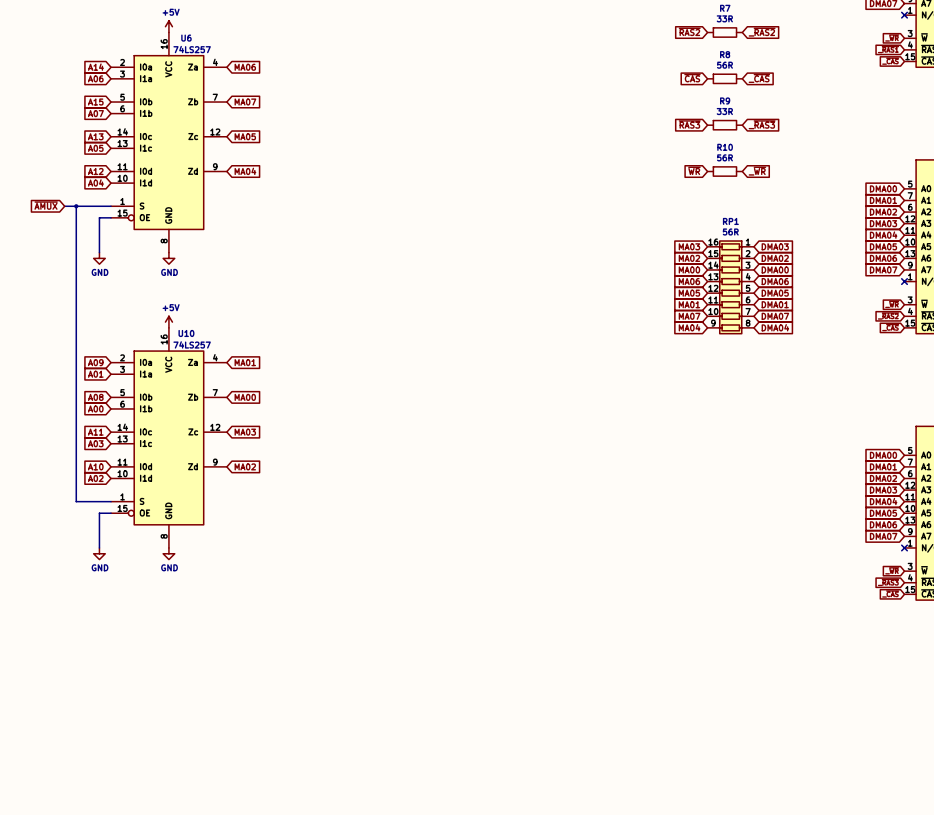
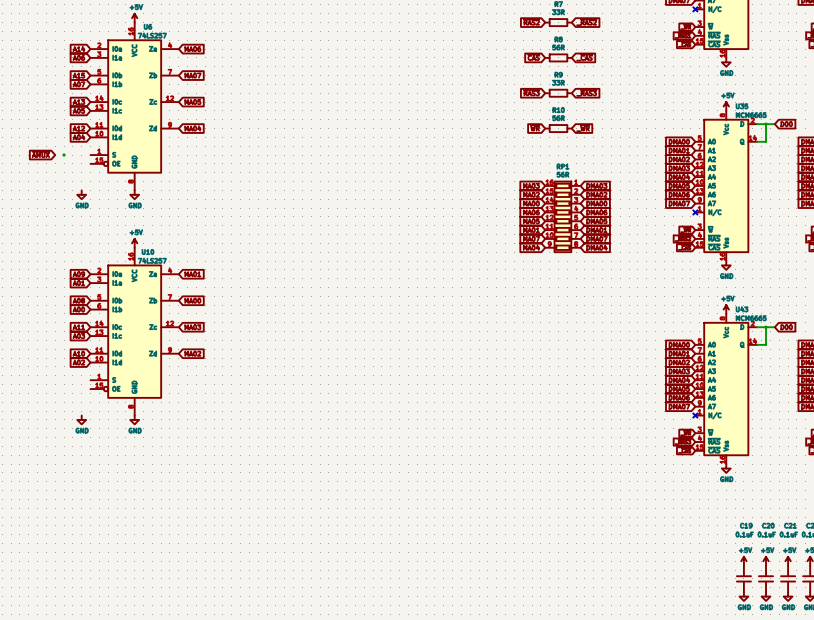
wire: (64, 206) (111, 206) -> none
wire: (76, 206) (76, 501) (111, 501) -> none
wire: (111, 217) (99, 217) (99, 252) -> none
wire: (111, 513) (99, 513) (99, 547) -> none

